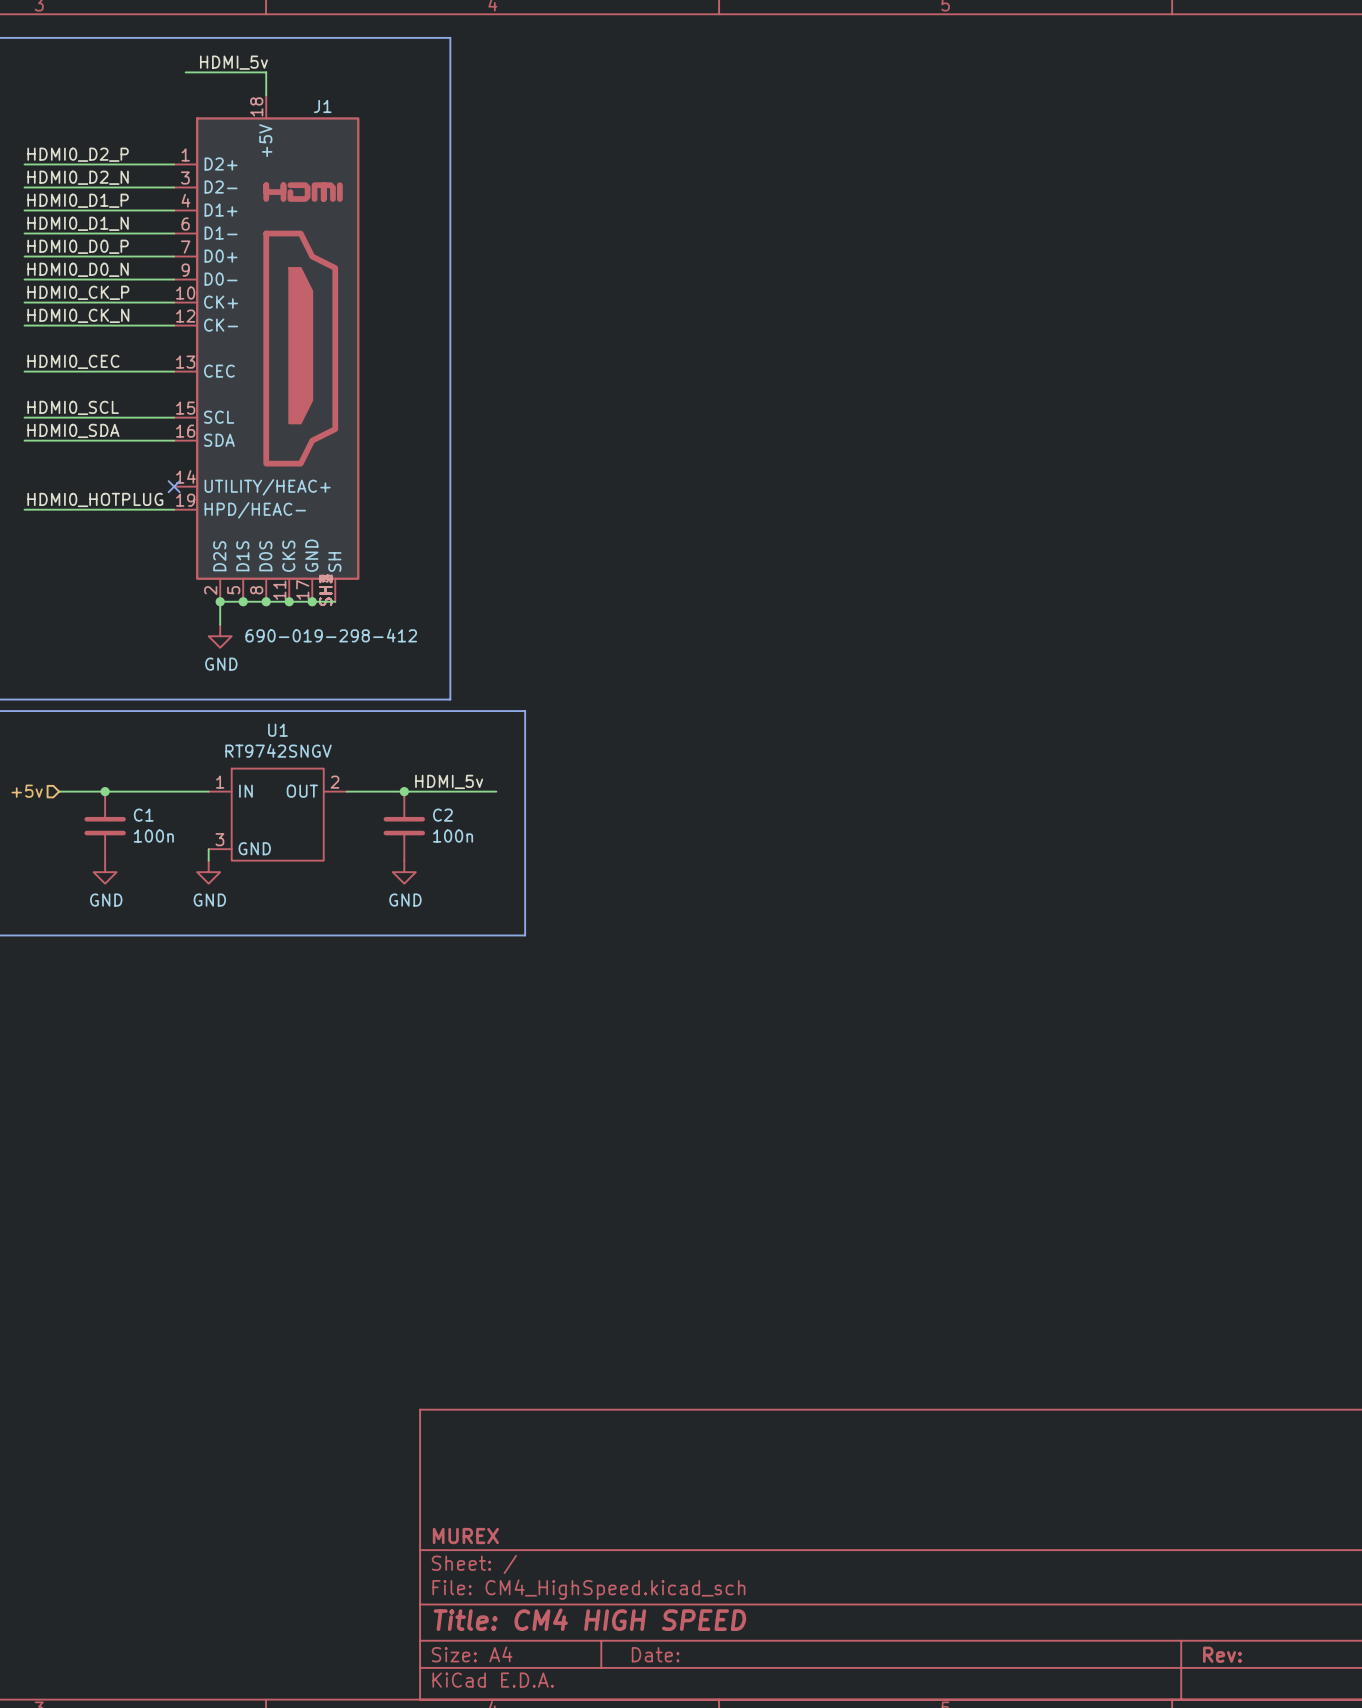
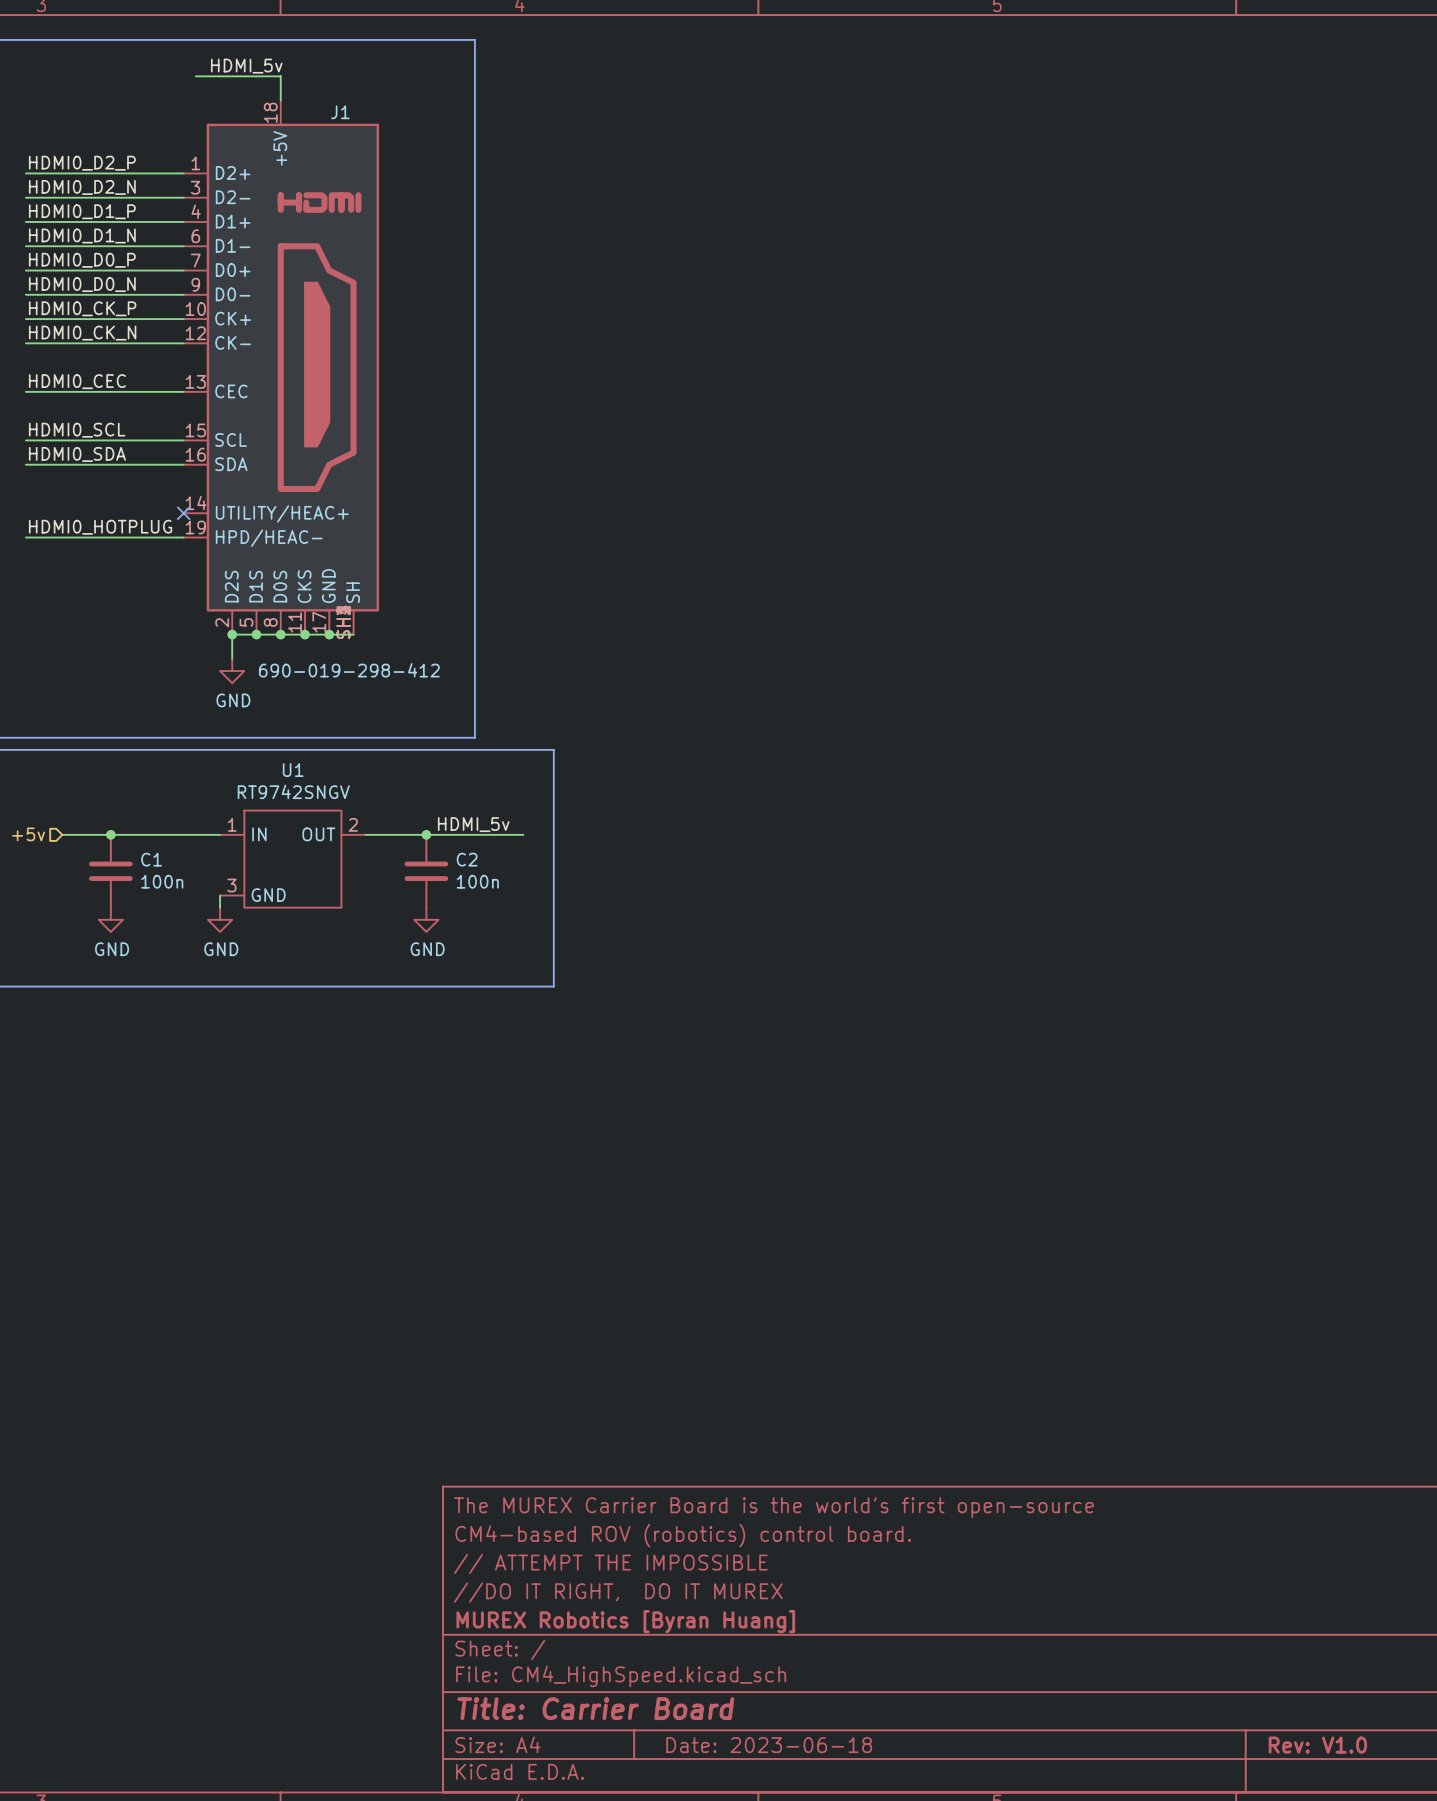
title block: none -> The MUREX Carrier Board is the world's first open-source (774, 1507)
title block: none -> CM4-based ROV (robotics) control board. (683, 1535)
title block: none -> // ATTEMPT THE IMPOSSIBLE (610, 1563)
title block: none -> //DO IT RIGHT, DO IT MUREX (618, 1592)
title block: MUREX (465, 1536) -> MUREX Robotics [Byran Huang] (625, 1621)
title block: Title: CM4 HIGH SPEED (589, 1619) -> Title: Carrier Board (595, 1708)
title block: Date: (655, 1654) -> Date: 2023-06-18 (769, 1745)
title block: Rev: (1222, 1654) -> Rev: V1.0 (1317, 1745)

